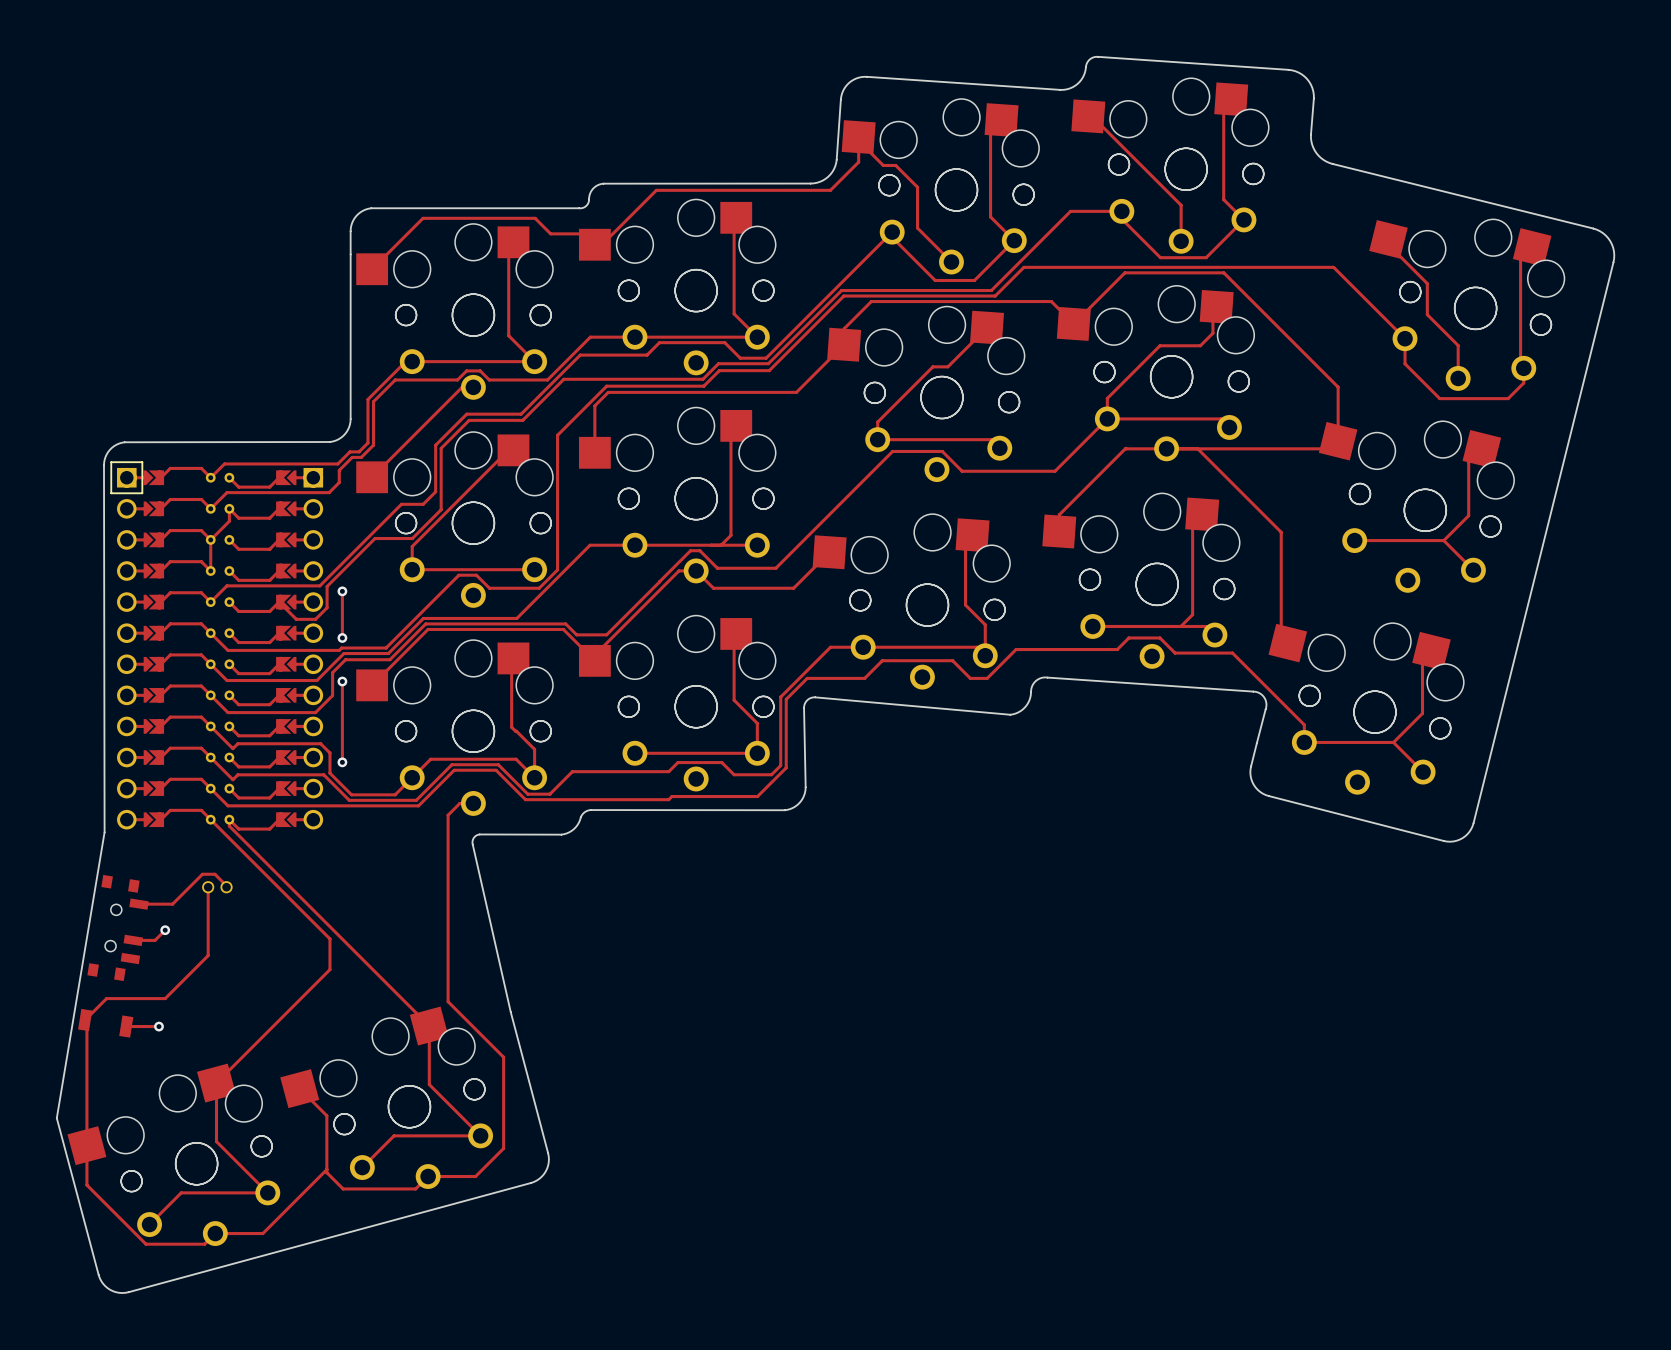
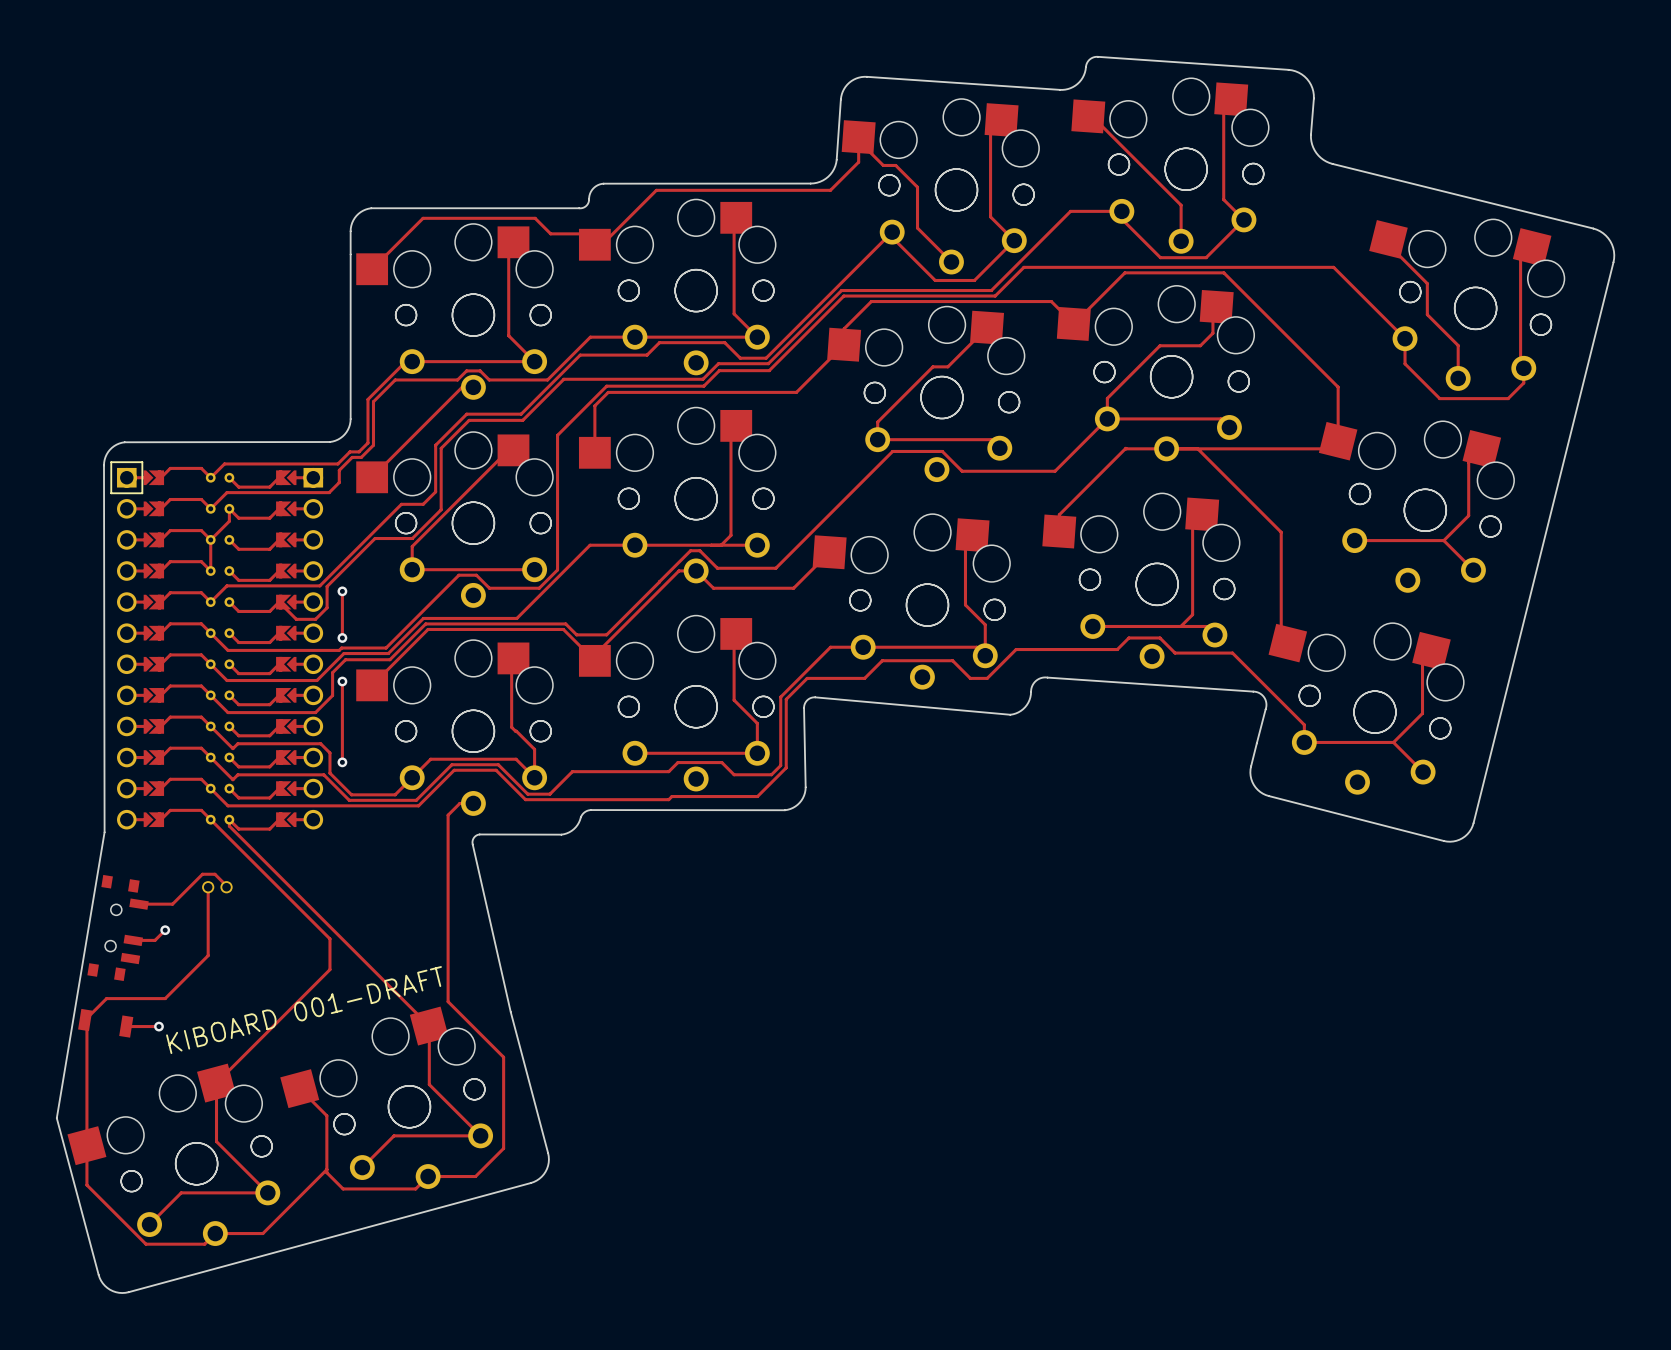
text: none -> KIBOARD 001-DRAFT (303, 1010)

